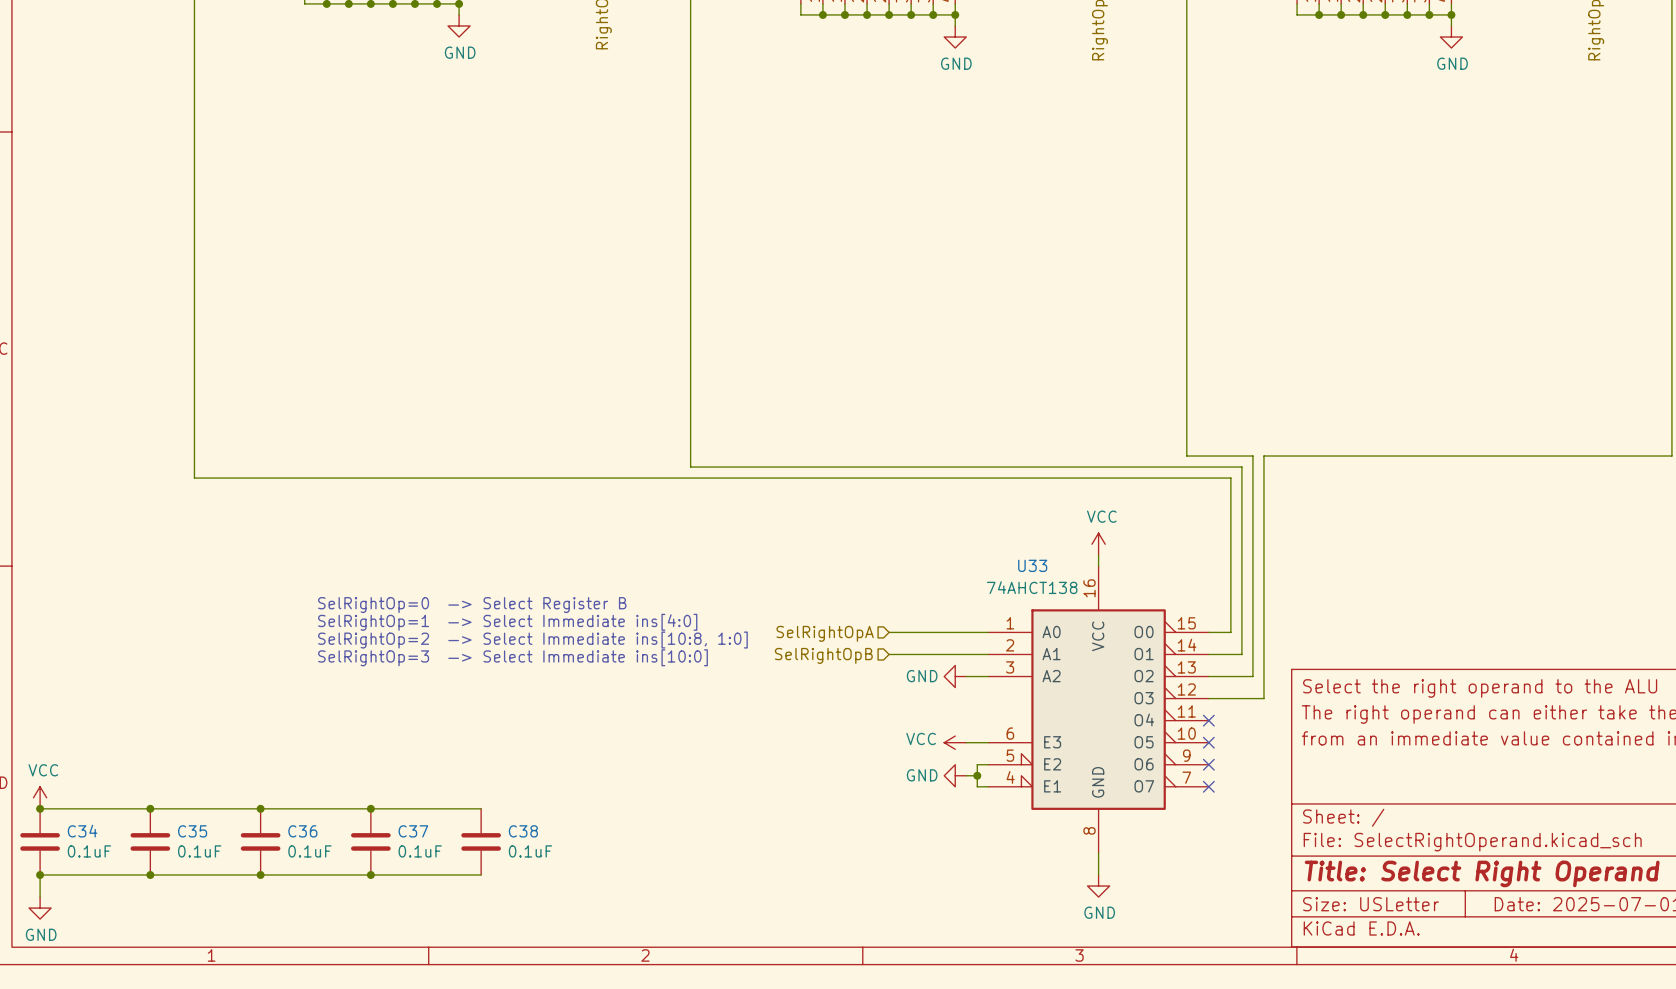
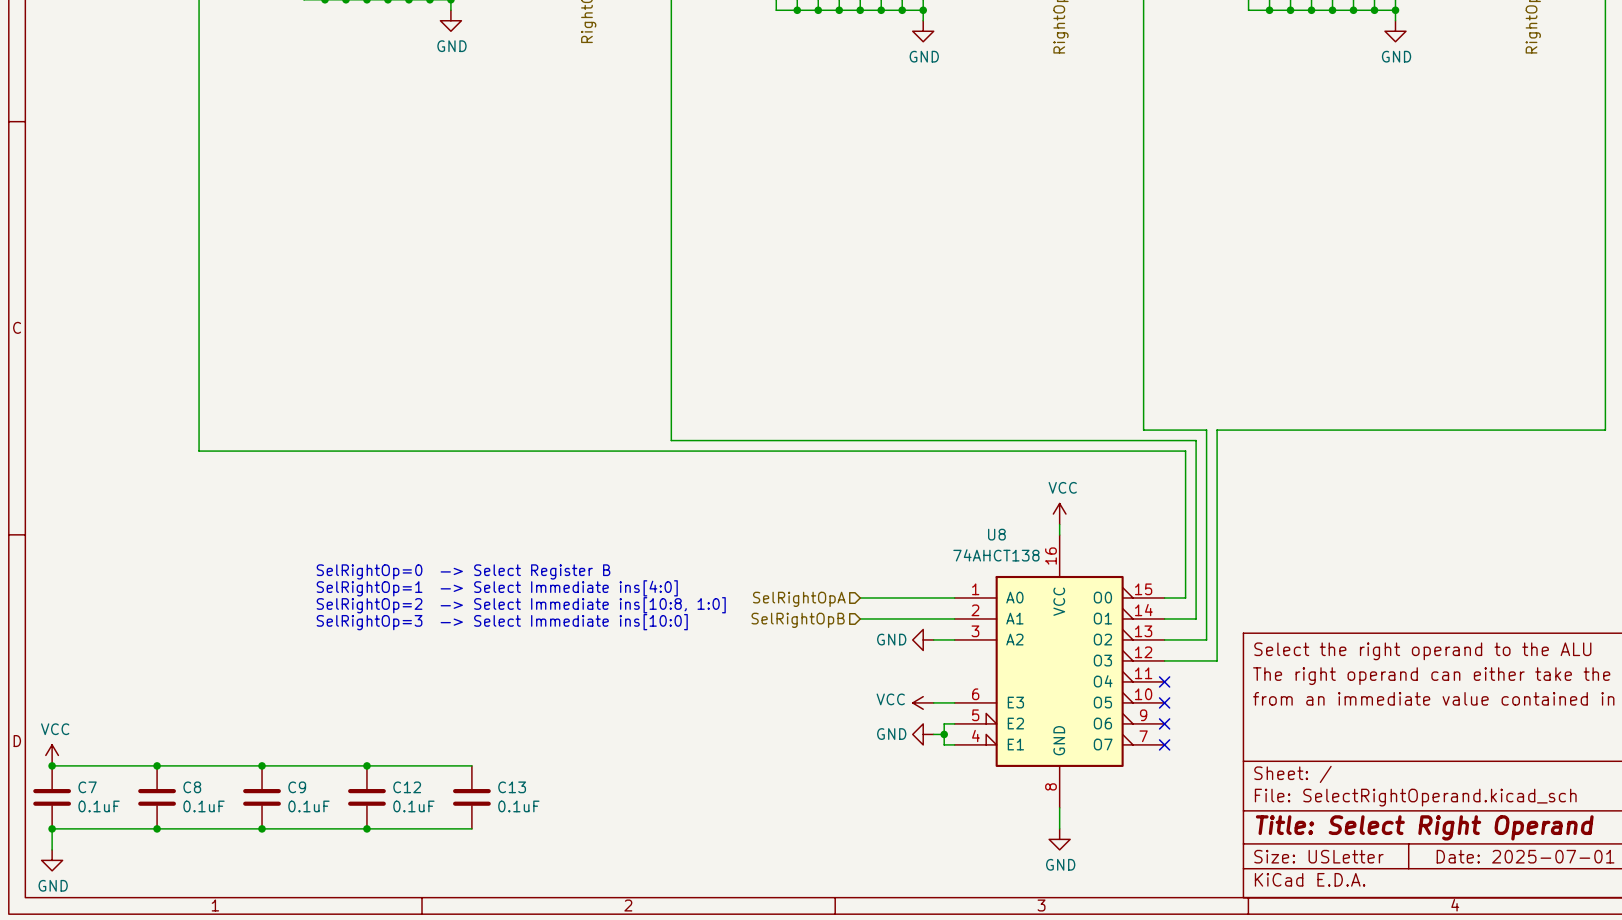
U33 name: U33 (1032, 565) -> U8 (996, 534)
C34 name: C34 (82, 831) -> C7 (87, 787)
C35 name: C35 (192, 831) -> C8 (192, 787)
C36 name: C36 (302, 831) -> C9 (297, 787)
C37 name: C37 (413, 831) -> C12 (407, 787)
C38 name: C38 (523, 831) -> C13 (512, 787)

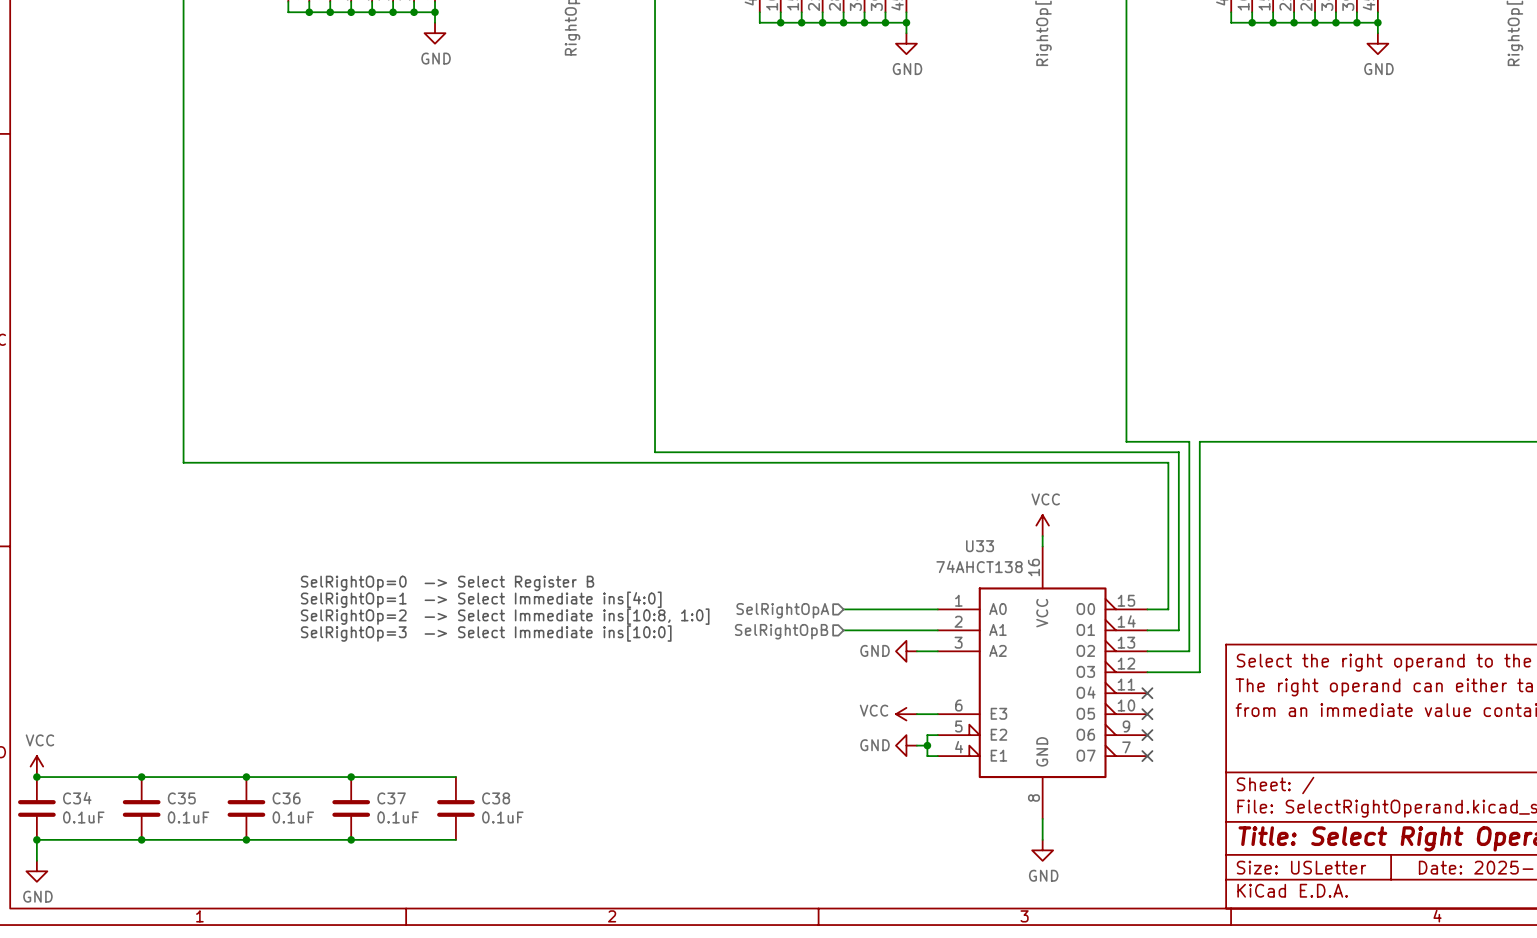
U8 name: U8 (996, 534) -> U33 (980, 546)
C7 name: C7 (87, 787) -> C34 (77, 798)
C8 name: C8 (192, 787) -> C35 (181, 798)
C9 name: C9 (297, 787) -> C36 (286, 798)
C12 name: C12 (407, 787) -> C37 (391, 798)
C13 name: C13 (512, 787) -> C38 (496, 798)

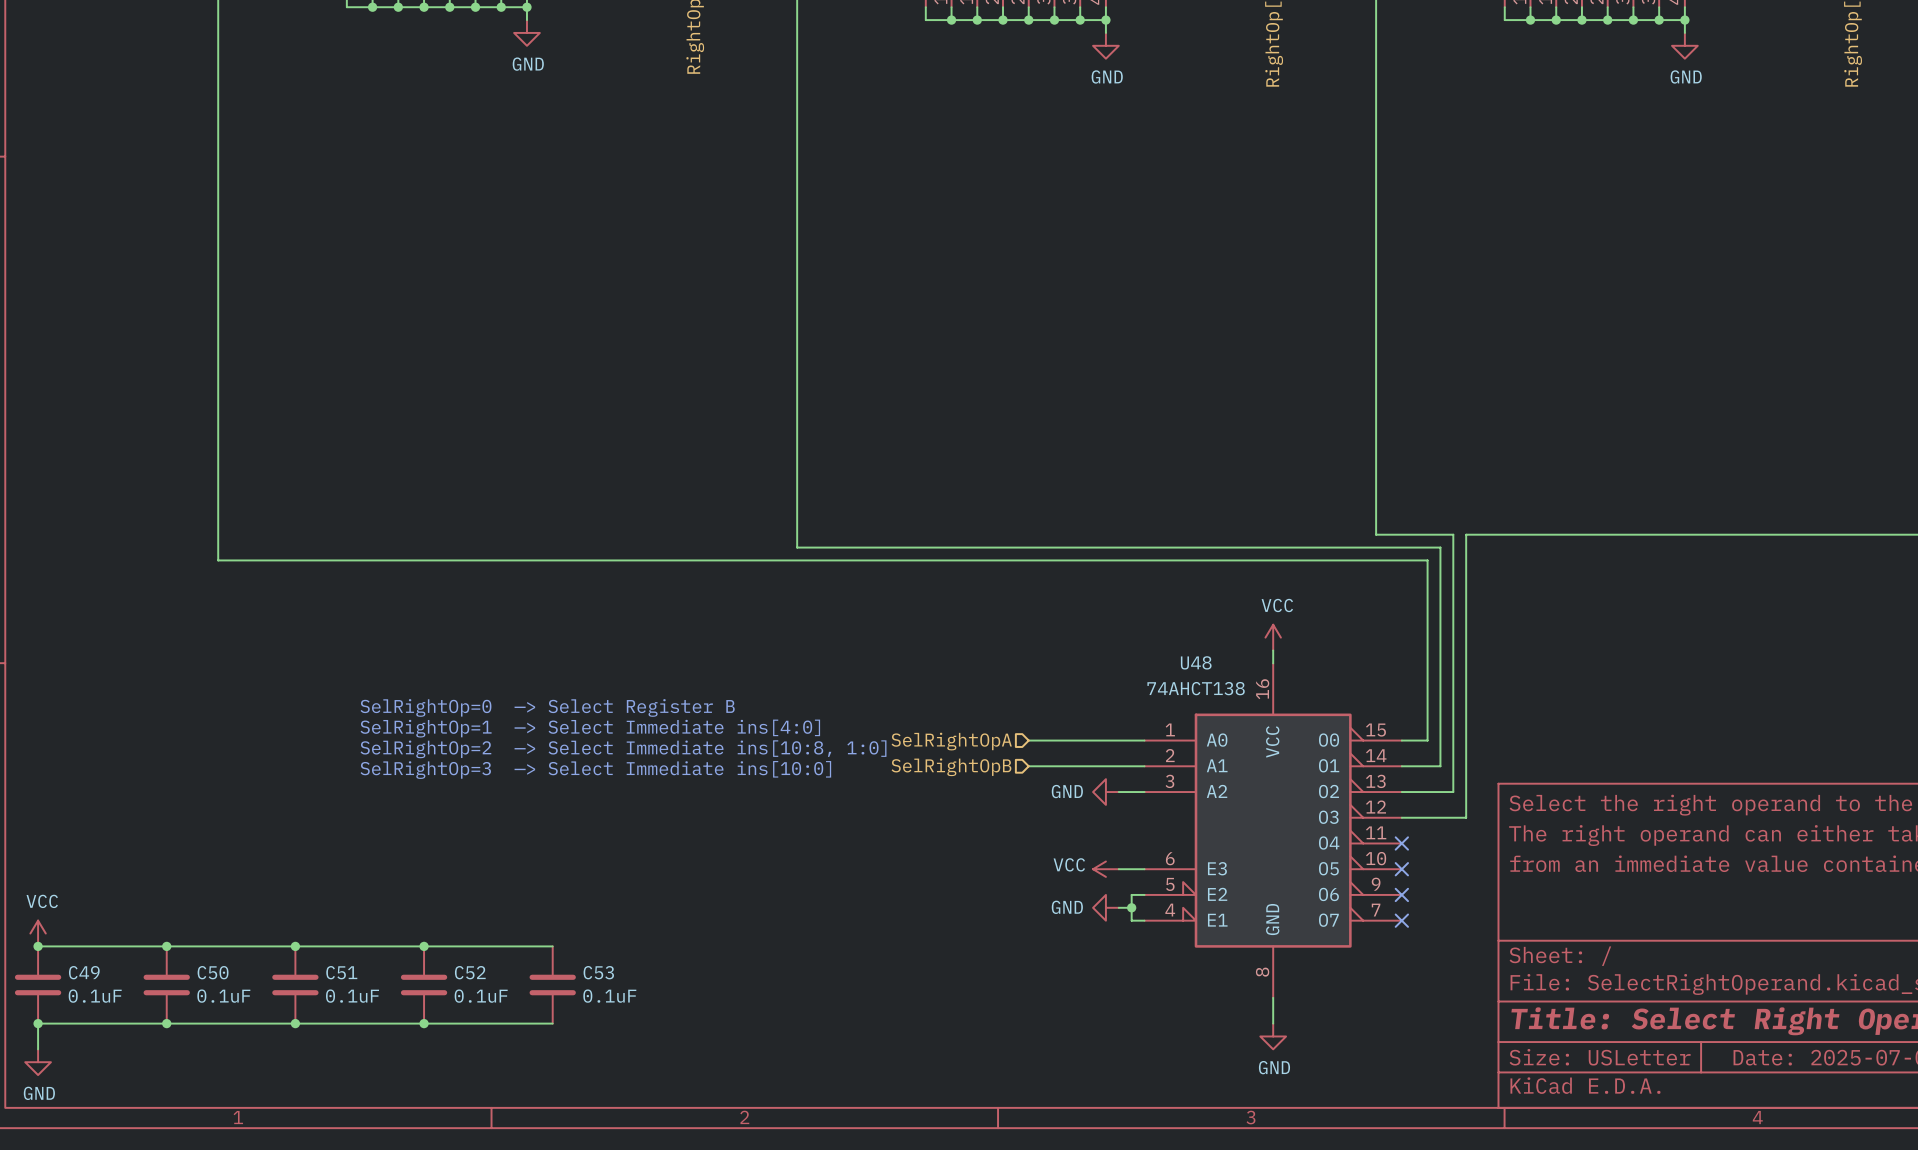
U33 name: U33 (980, 546) -> U48 (1196, 662)
C34 name: C34 (77, 798) -> C49 (84, 972)
C35 name: C35 (181, 798) -> C50 (213, 972)
C36 name: C36 (286, 798) -> C51 (341, 972)
C37 name: C37 (391, 798) -> C52 (470, 972)
C38 name: C38 (496, 798) -> C53 (598, 972)

